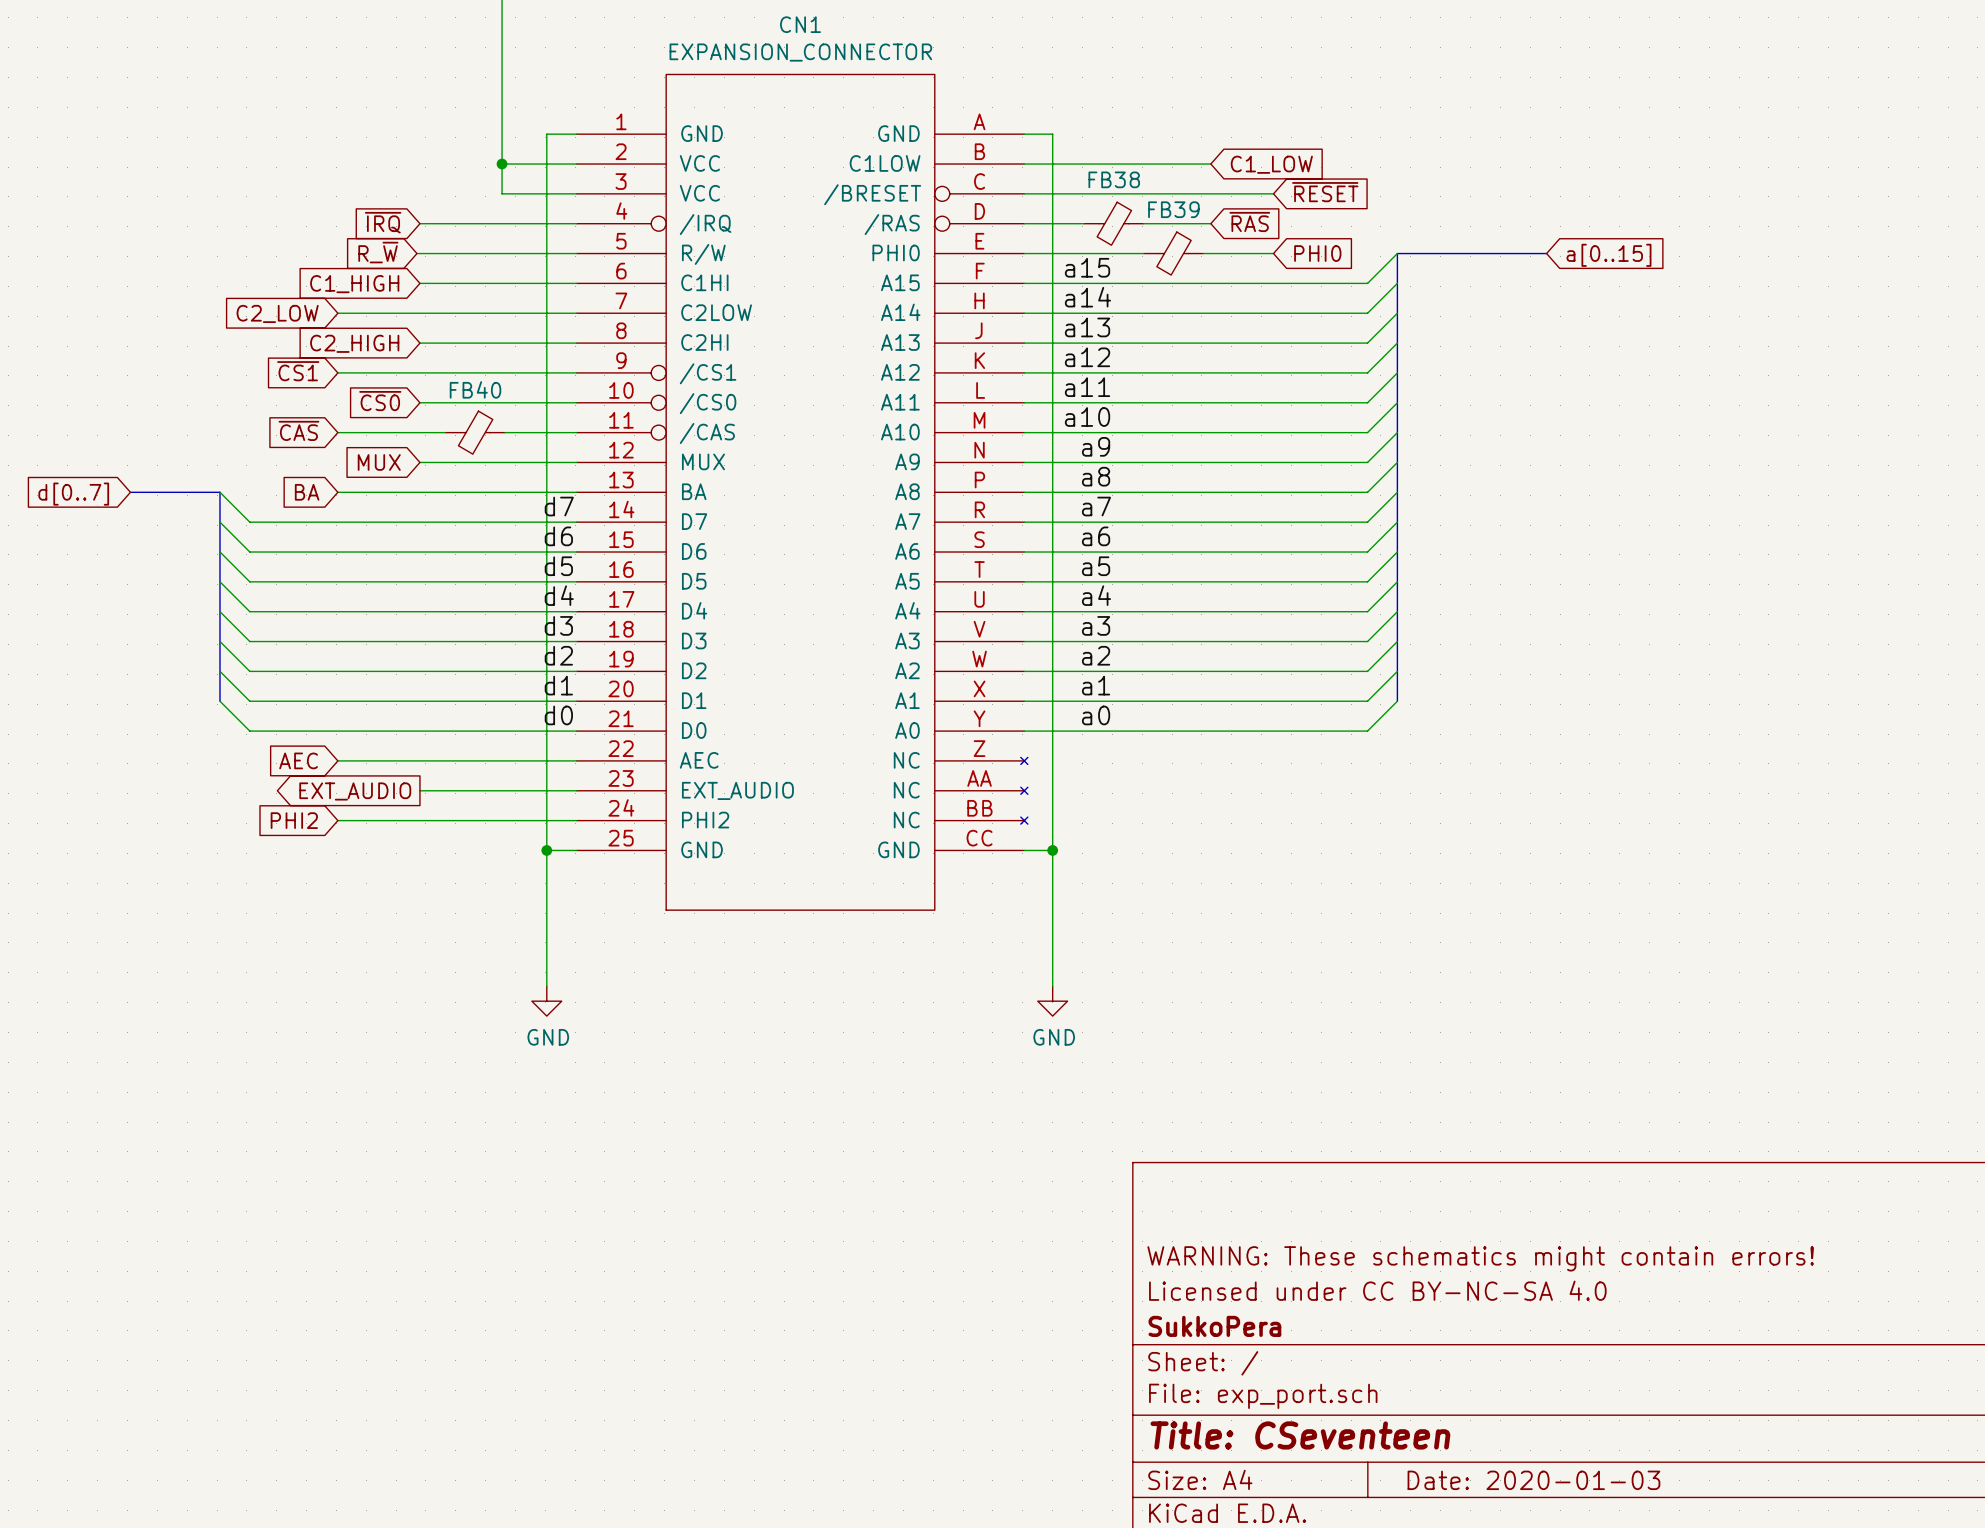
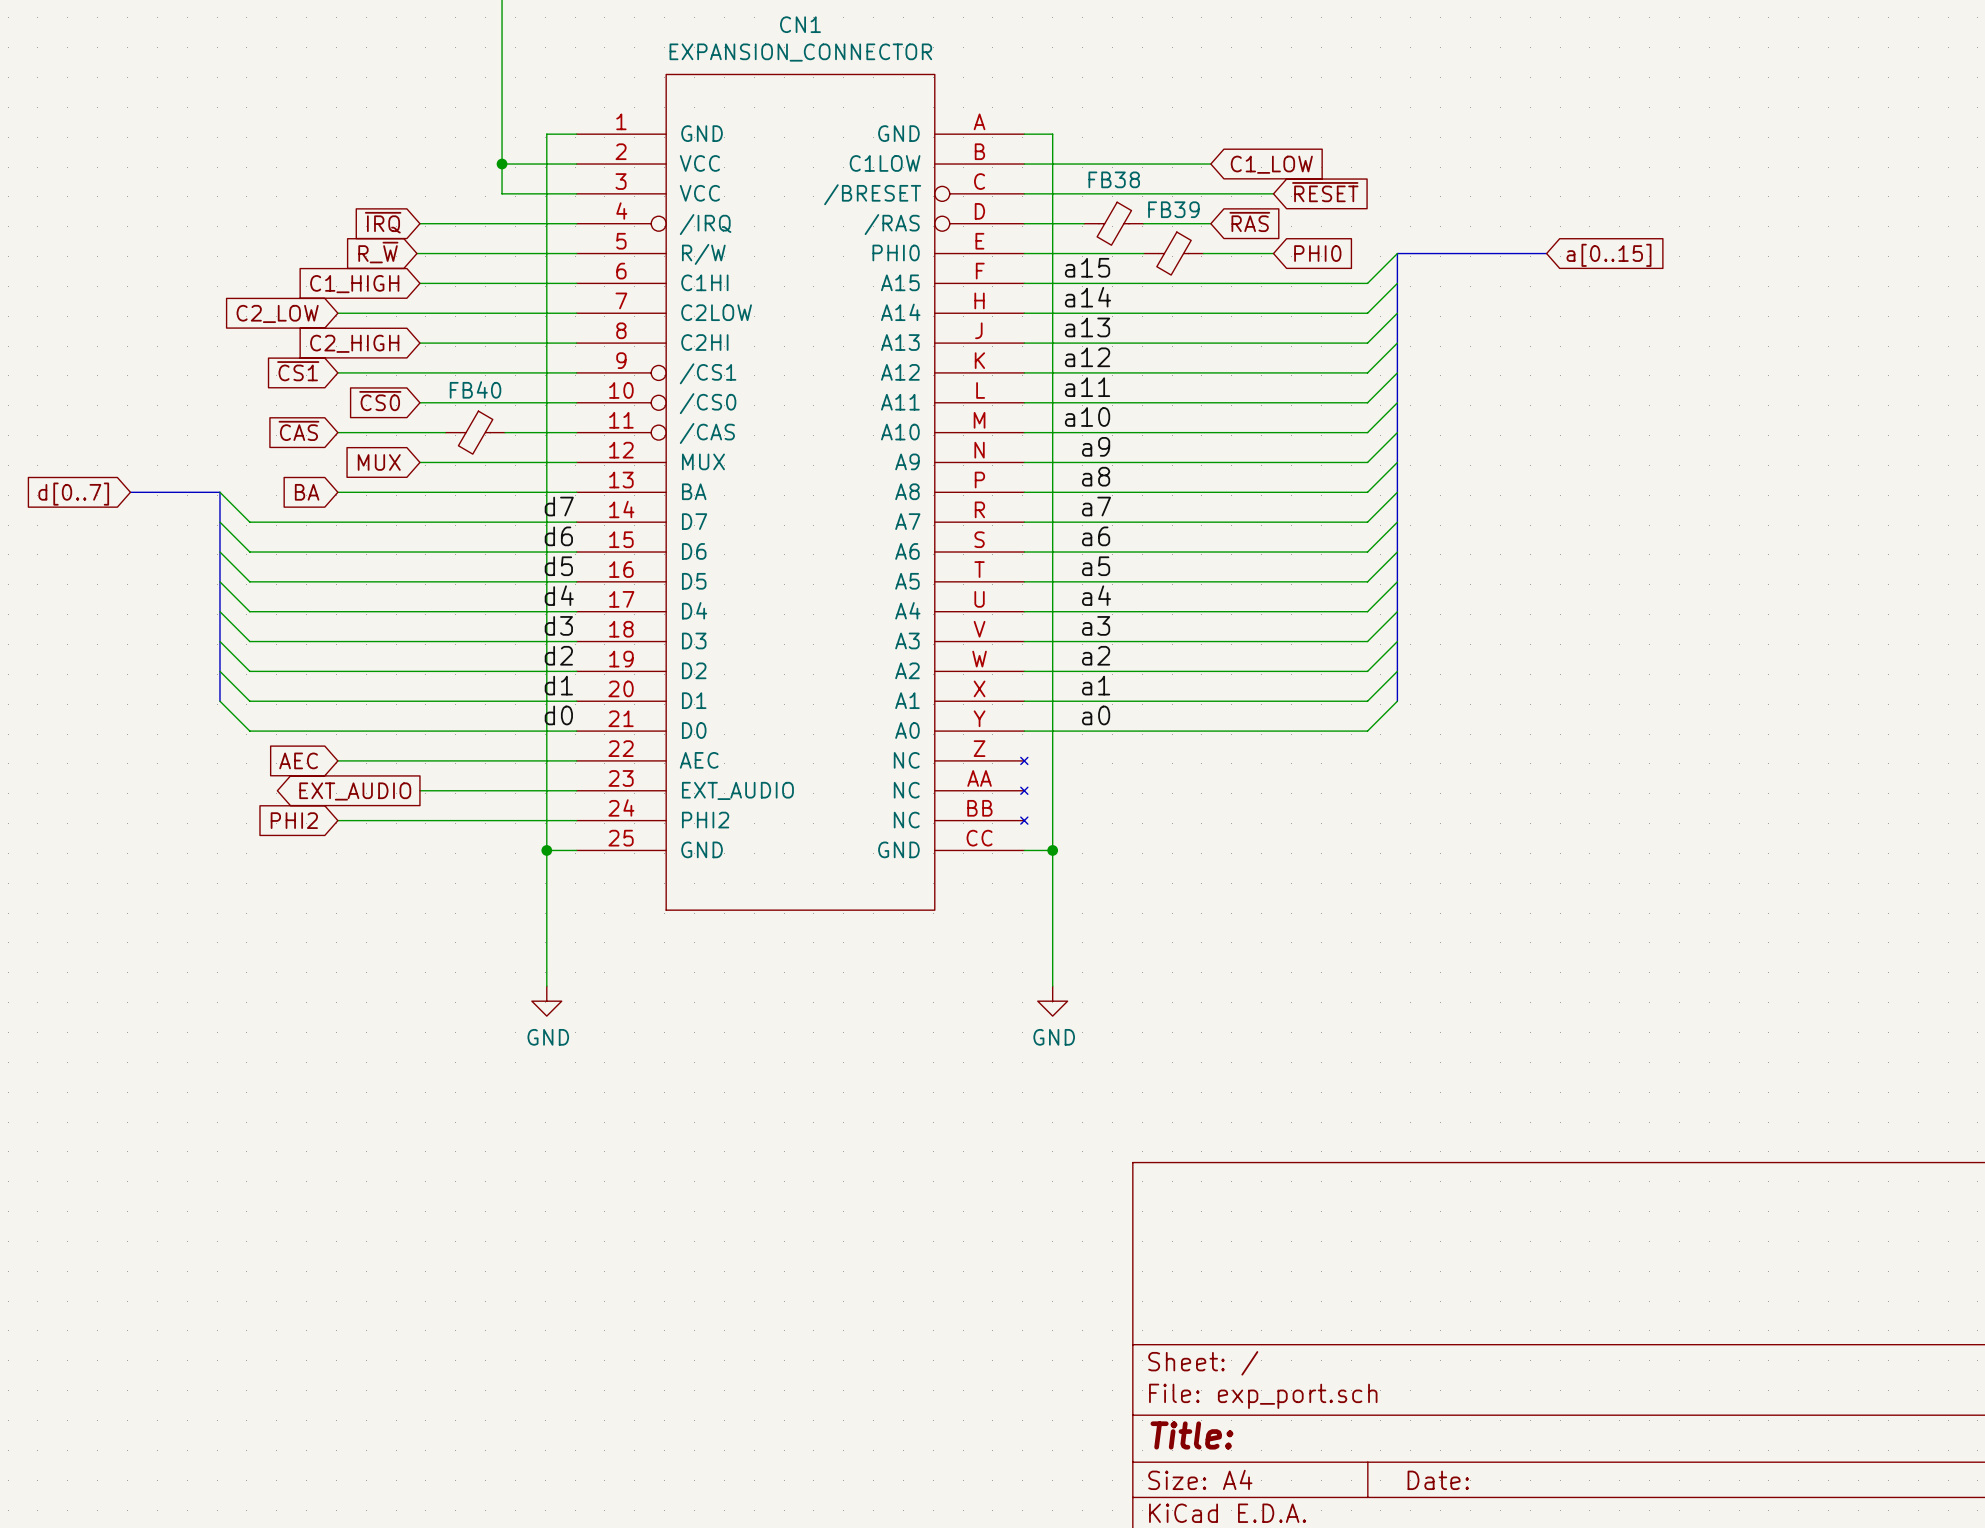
title block: WARNING: These schematics might contain errors! (1480, 1258) -> none
title block: Licensed under CC BY-NC-SA 4.0 (1377, 1290) -> none
title block: SukkoPera (1214, 1326) -> none
title block: Title: CSeventeen (1300, 1435) -> Title: (1191, 1435)
title block: Date: 2020-01-03 (1533, 1480) -> Date: (1438, 1480)

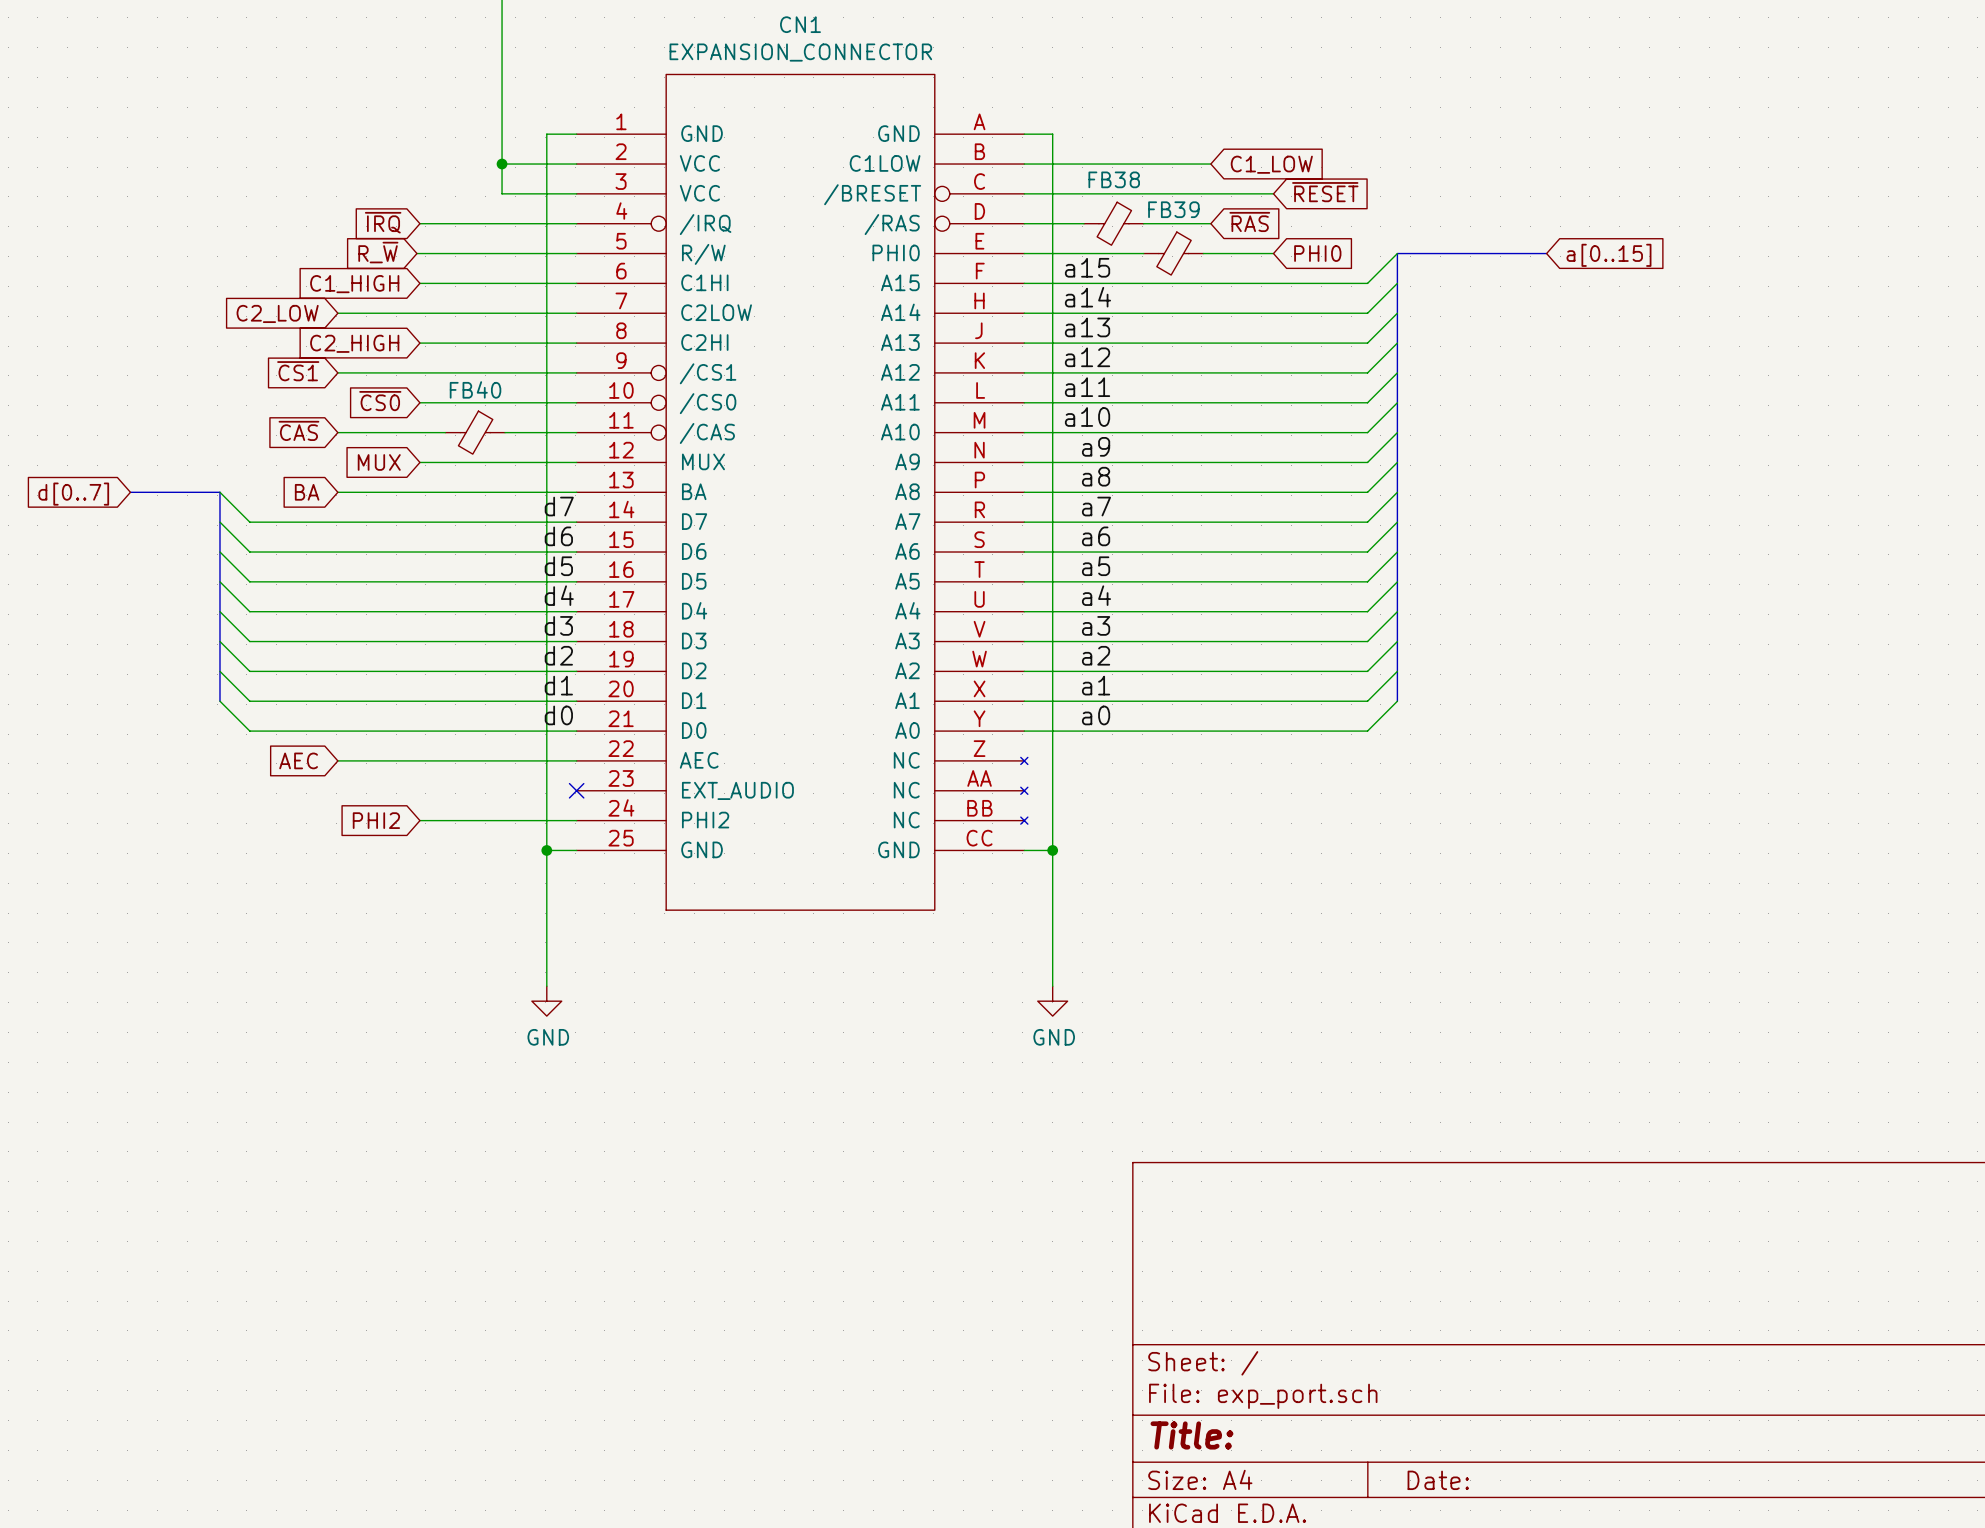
wire: (419, 790) (576, 790) -> none
no-connect mark: none -> (576, 790)
global label: EXT_AUDIO (355, 791) -> none
global label position: PHI2 (294, 820) -> PHI2 (376, 820)
wire: (337, 820) (419, 820) -> none

